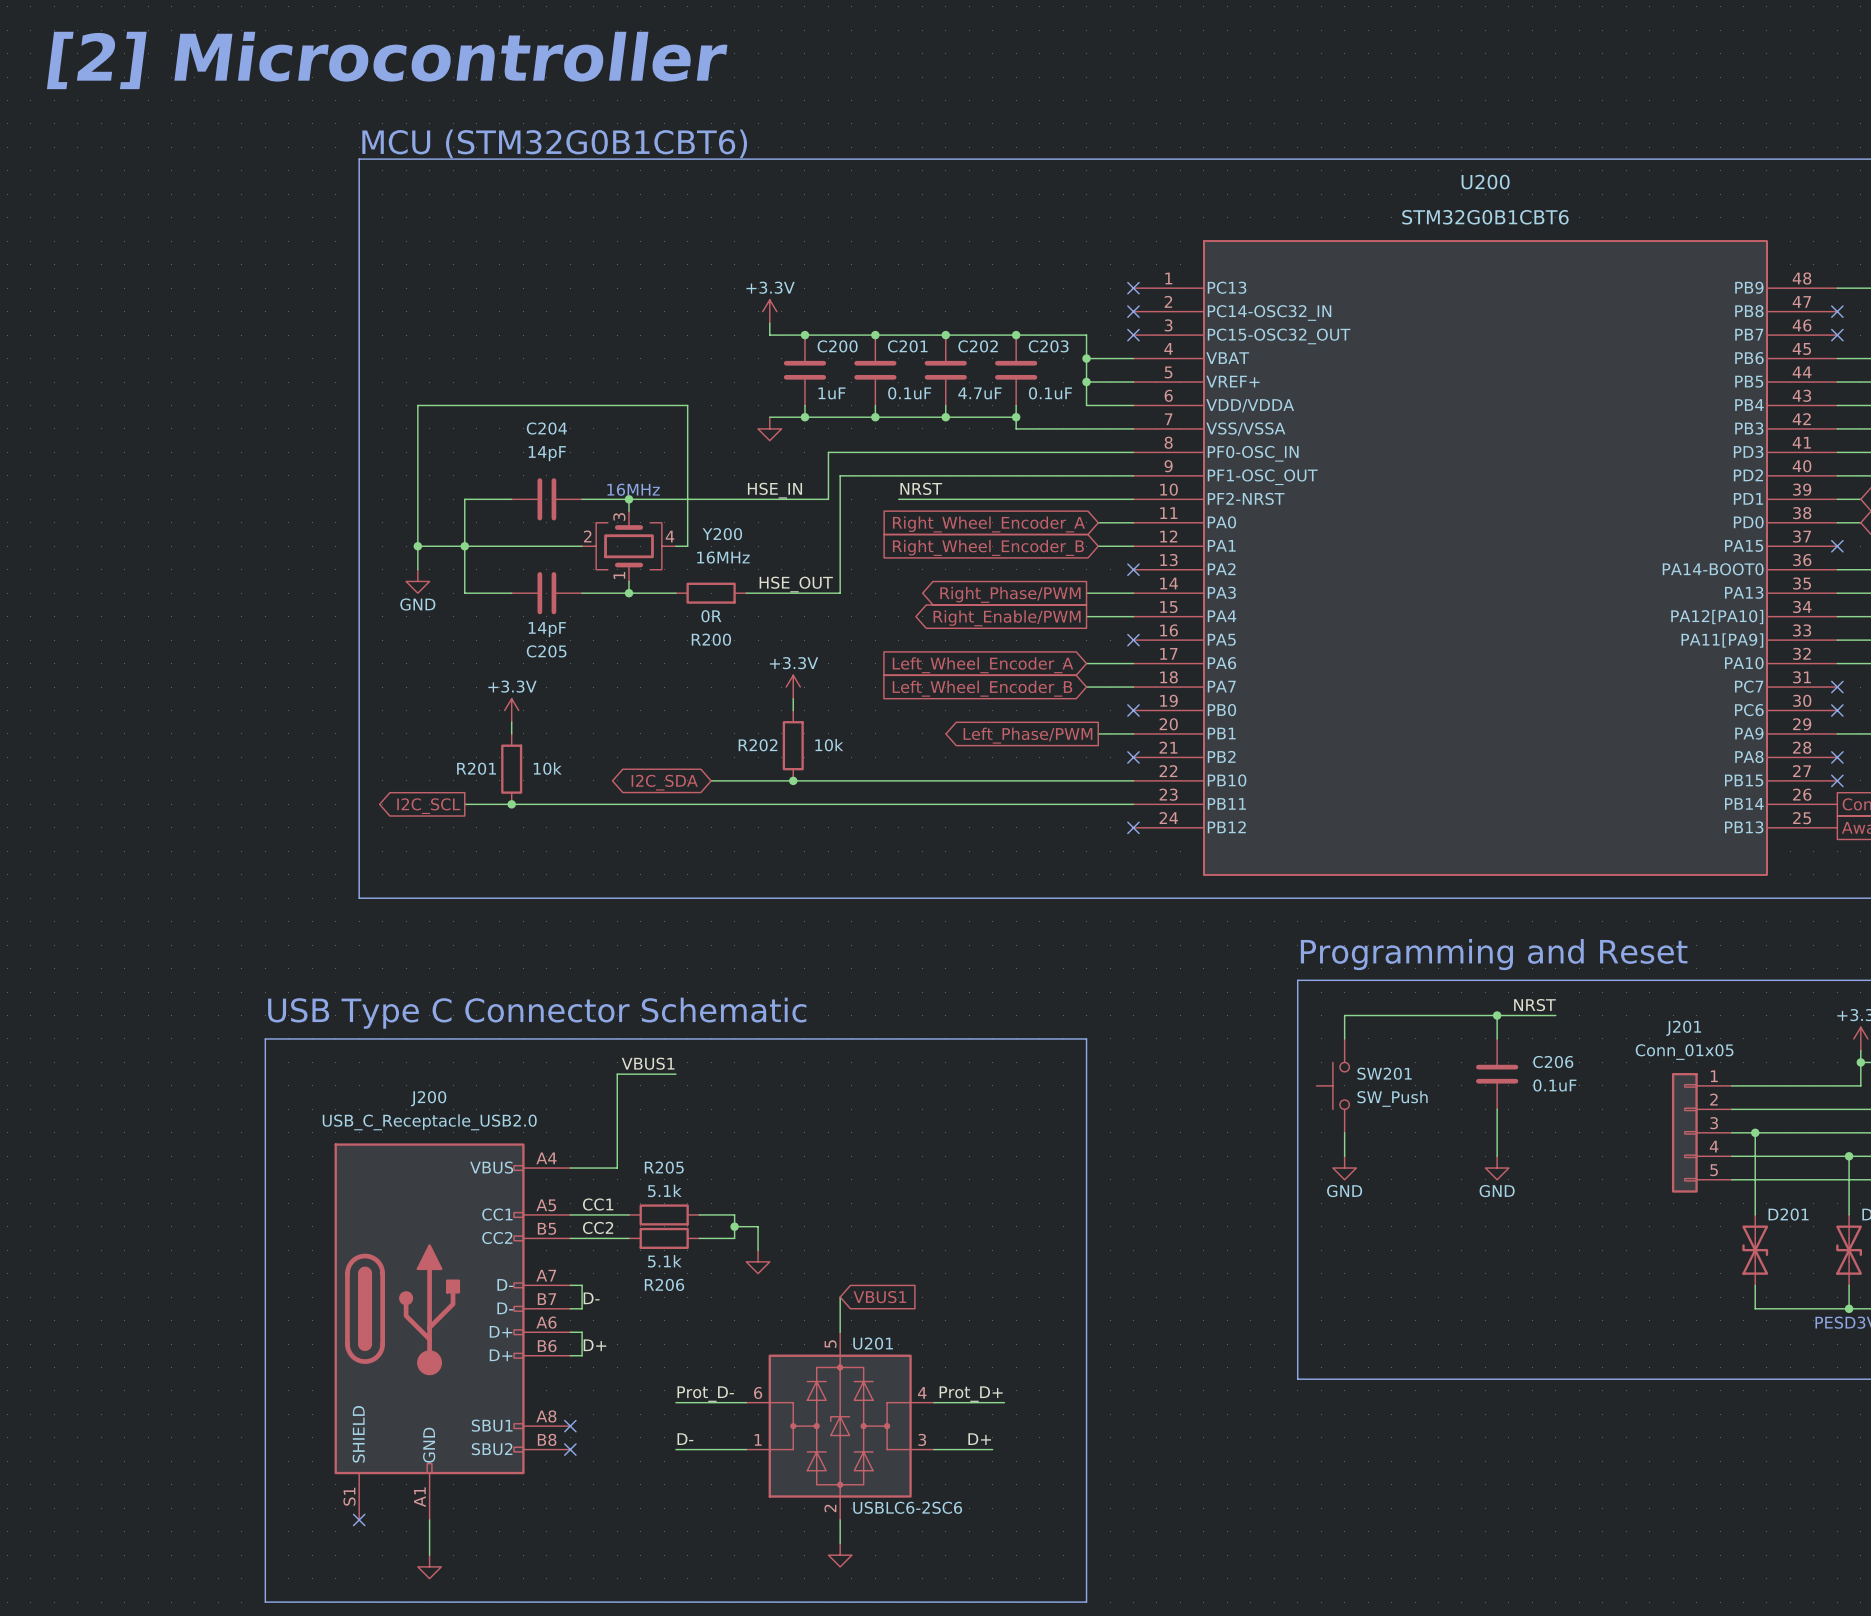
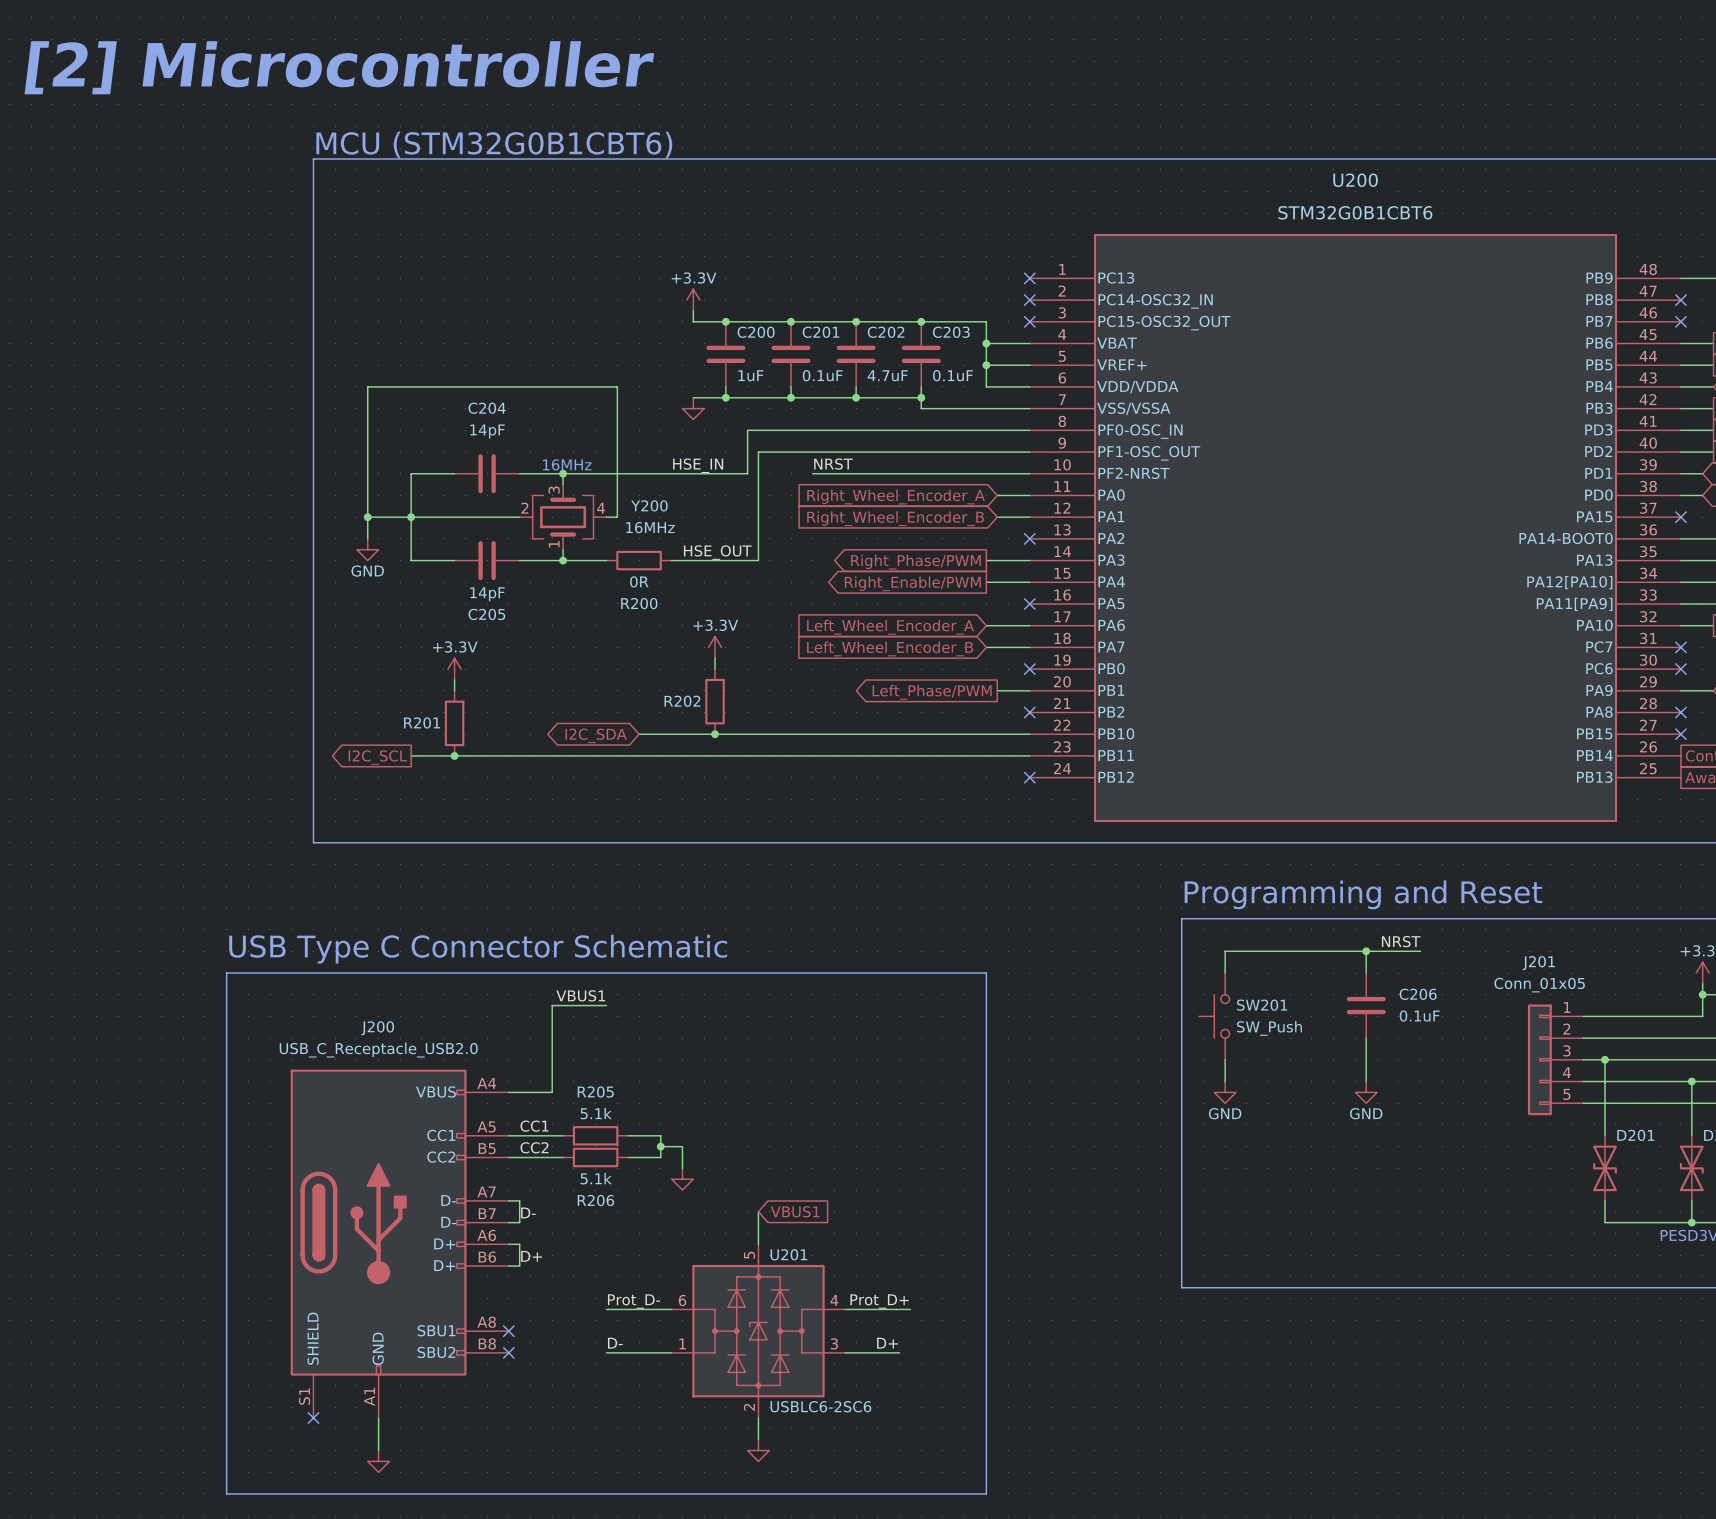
R202 value: 10k (829, 745) -> none
R201 value: 10k (547, 768) -> none

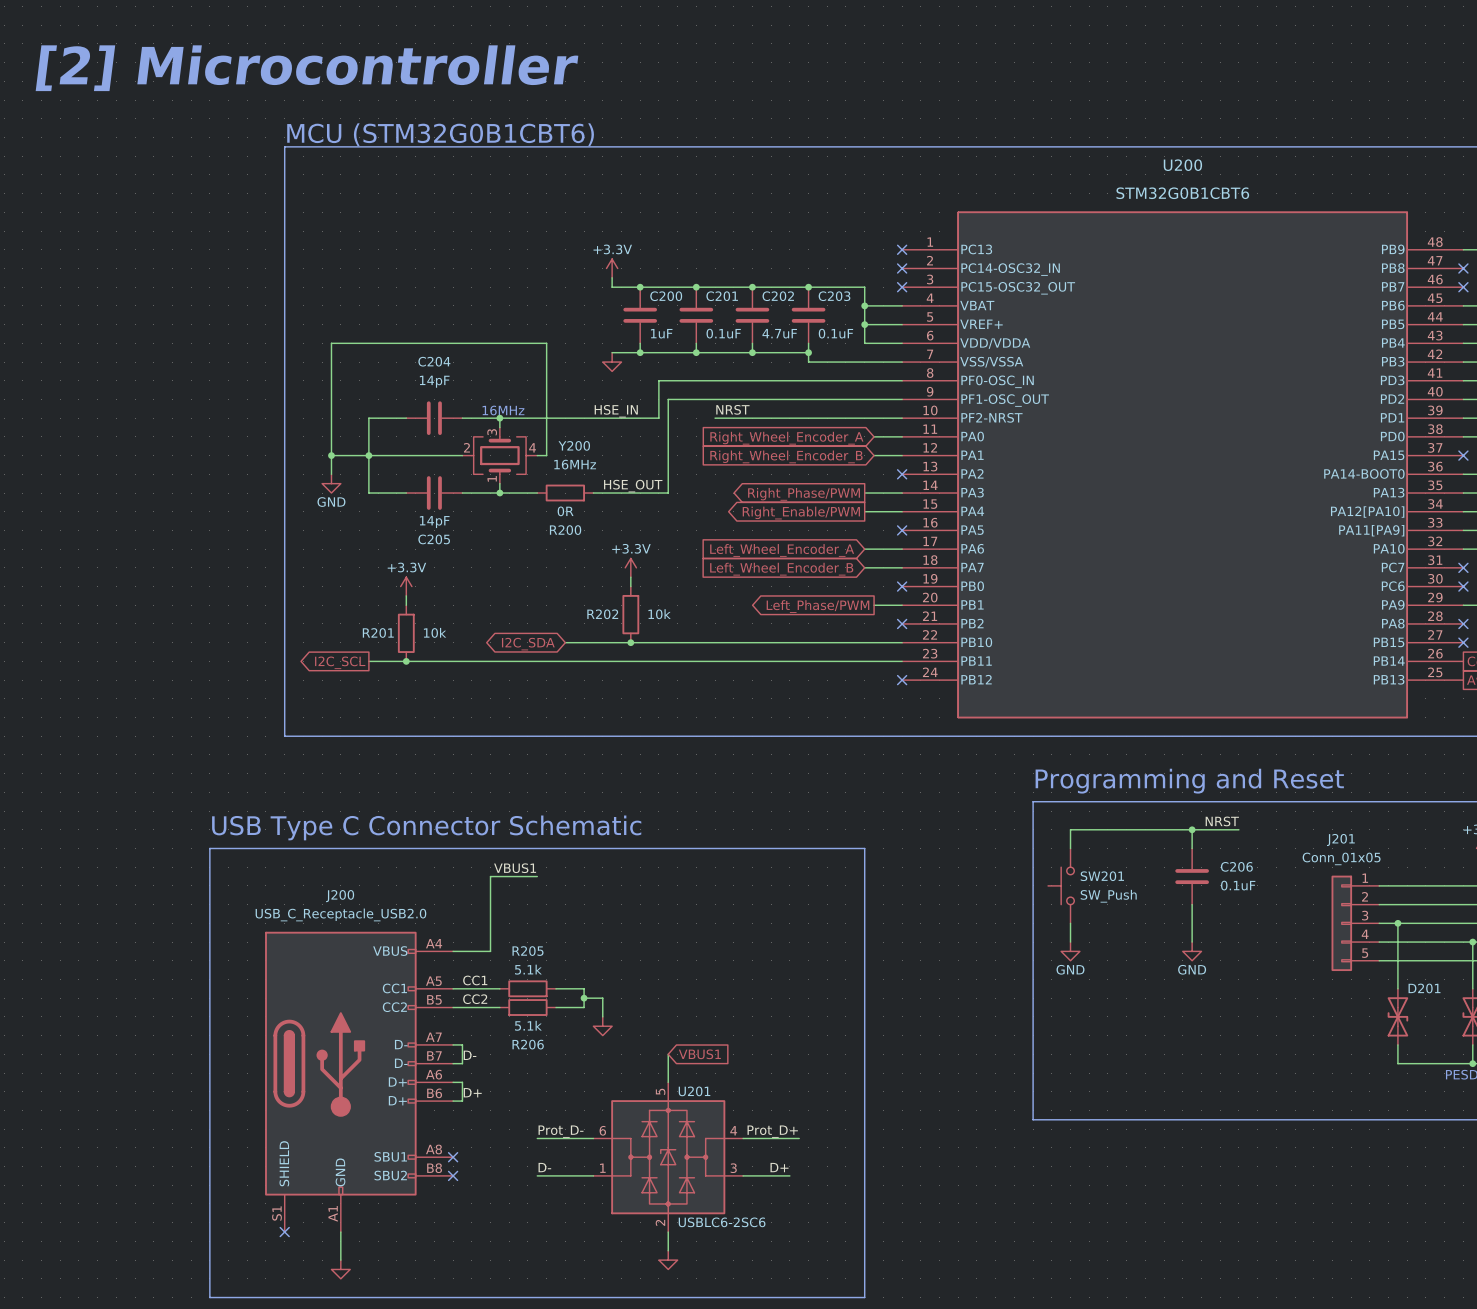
R202 value: none -> 10k (659, 614)
R201 value: none -> 10k (435, 632)

